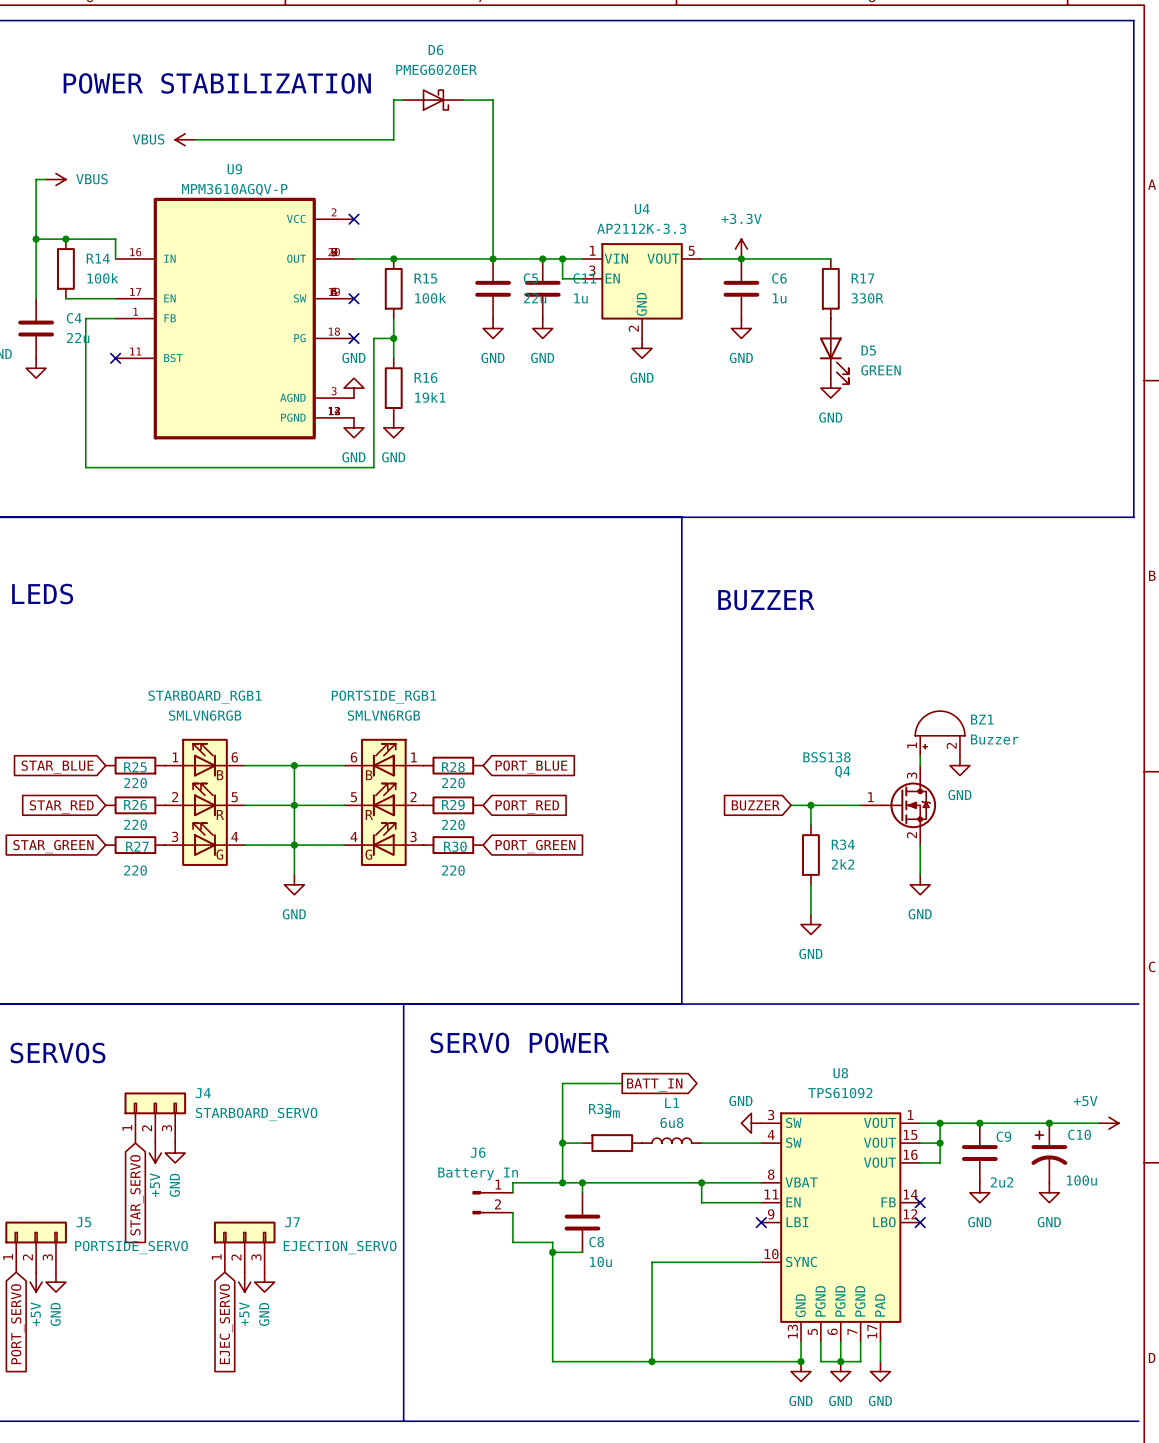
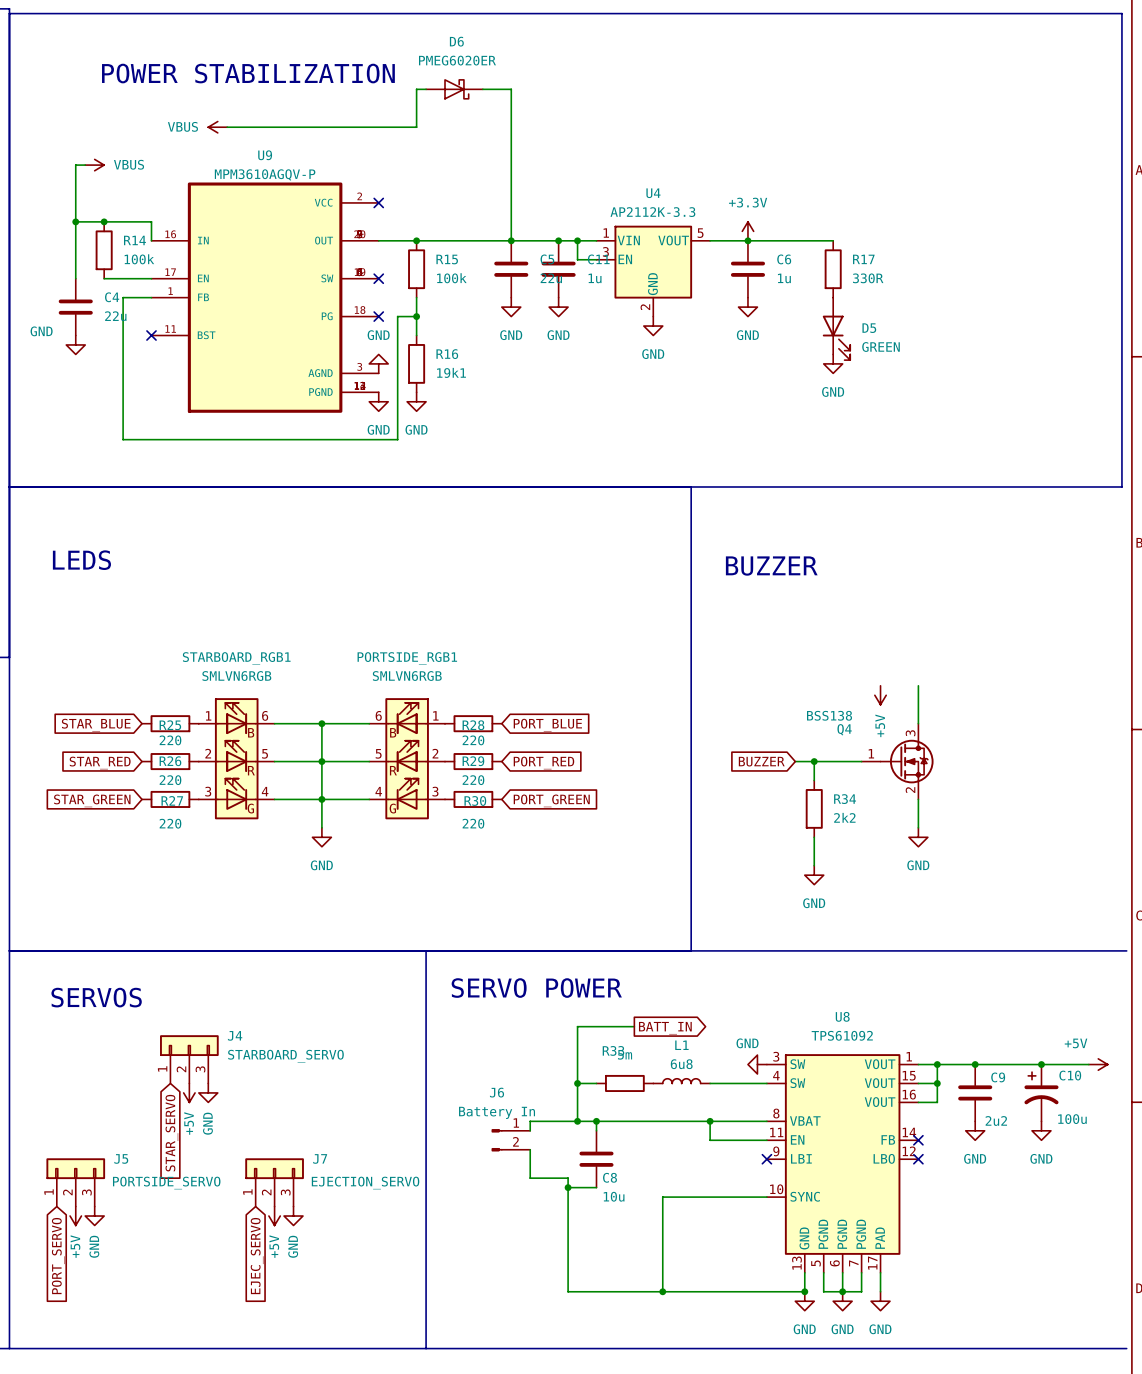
BZ1: Buzzer (940, 733) -> none
power symbol: none -> +5V (880, 695)
power symbol: GND (959, 765) -> none

